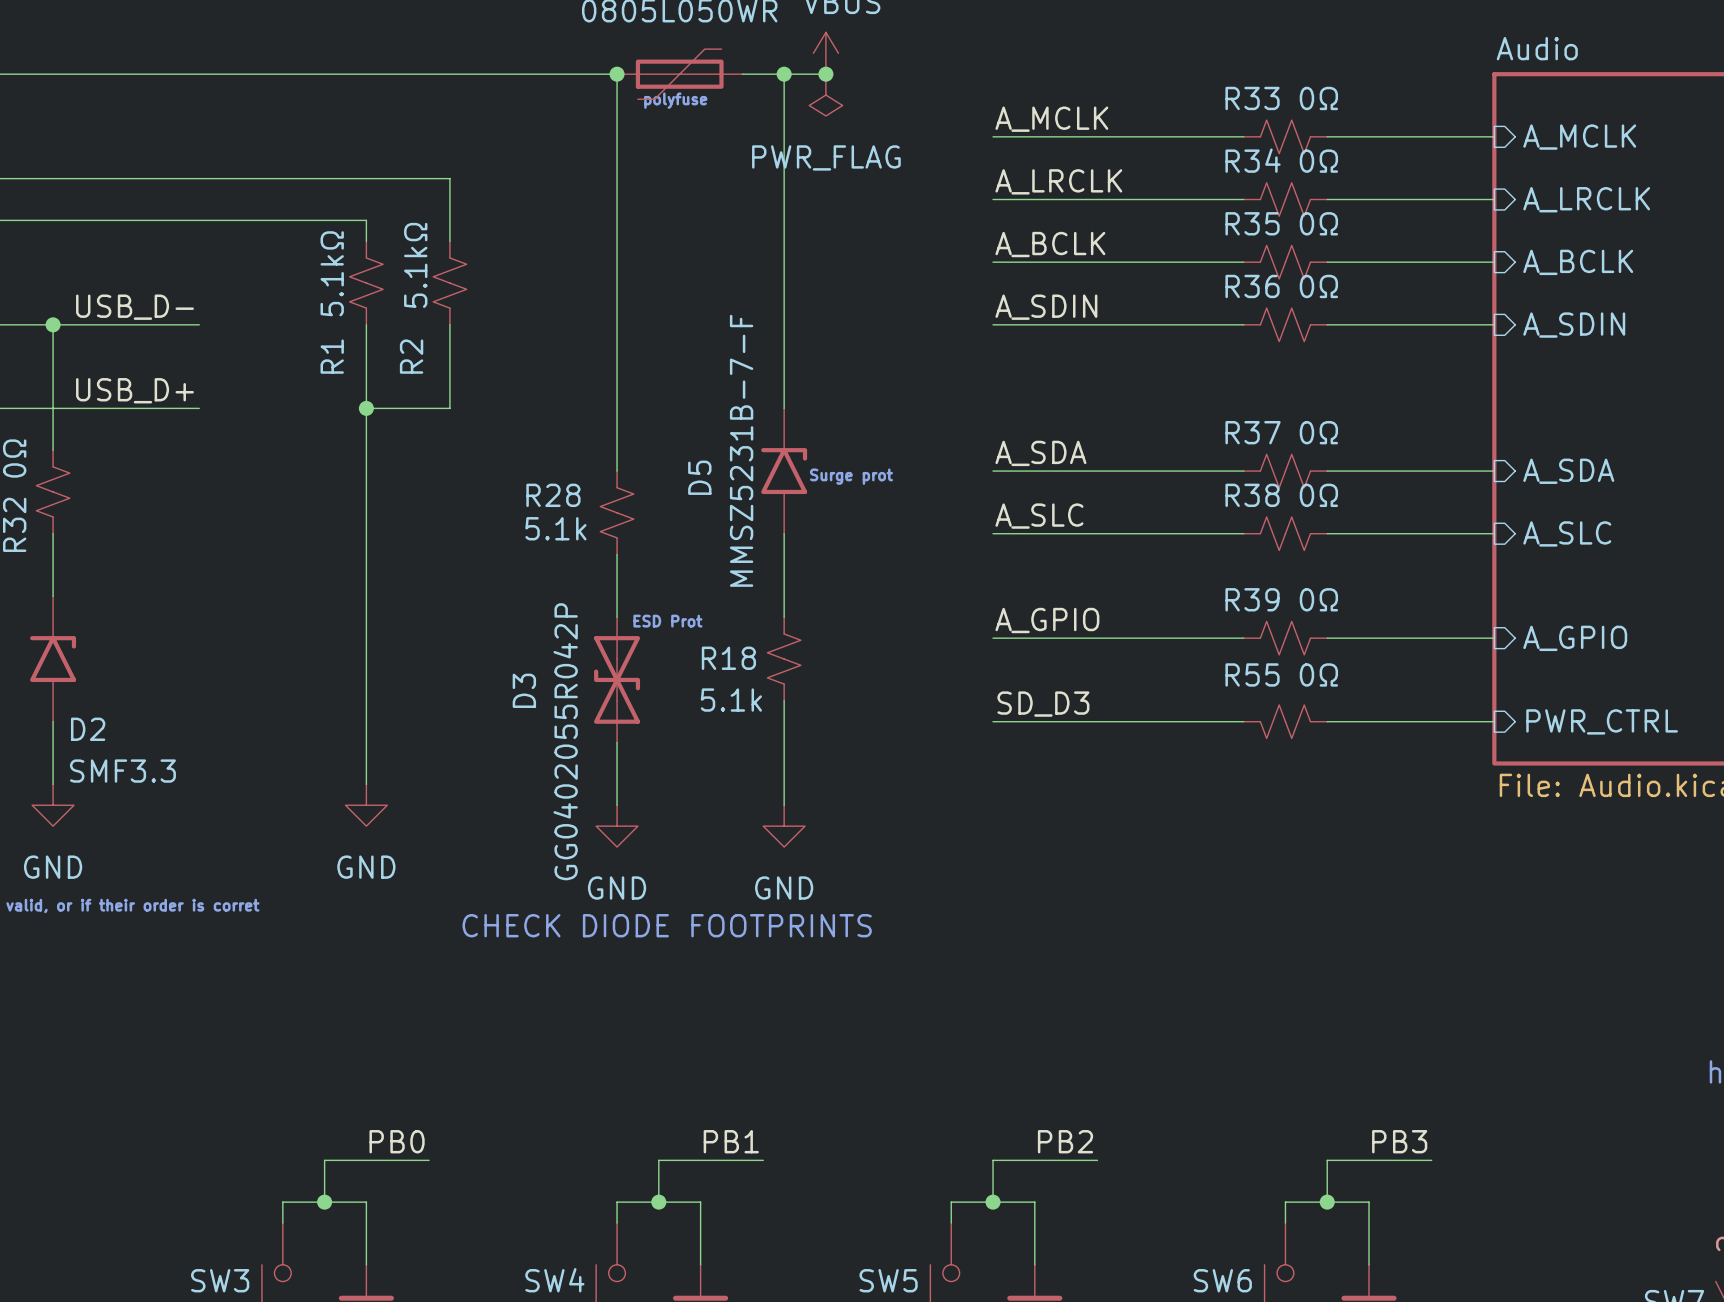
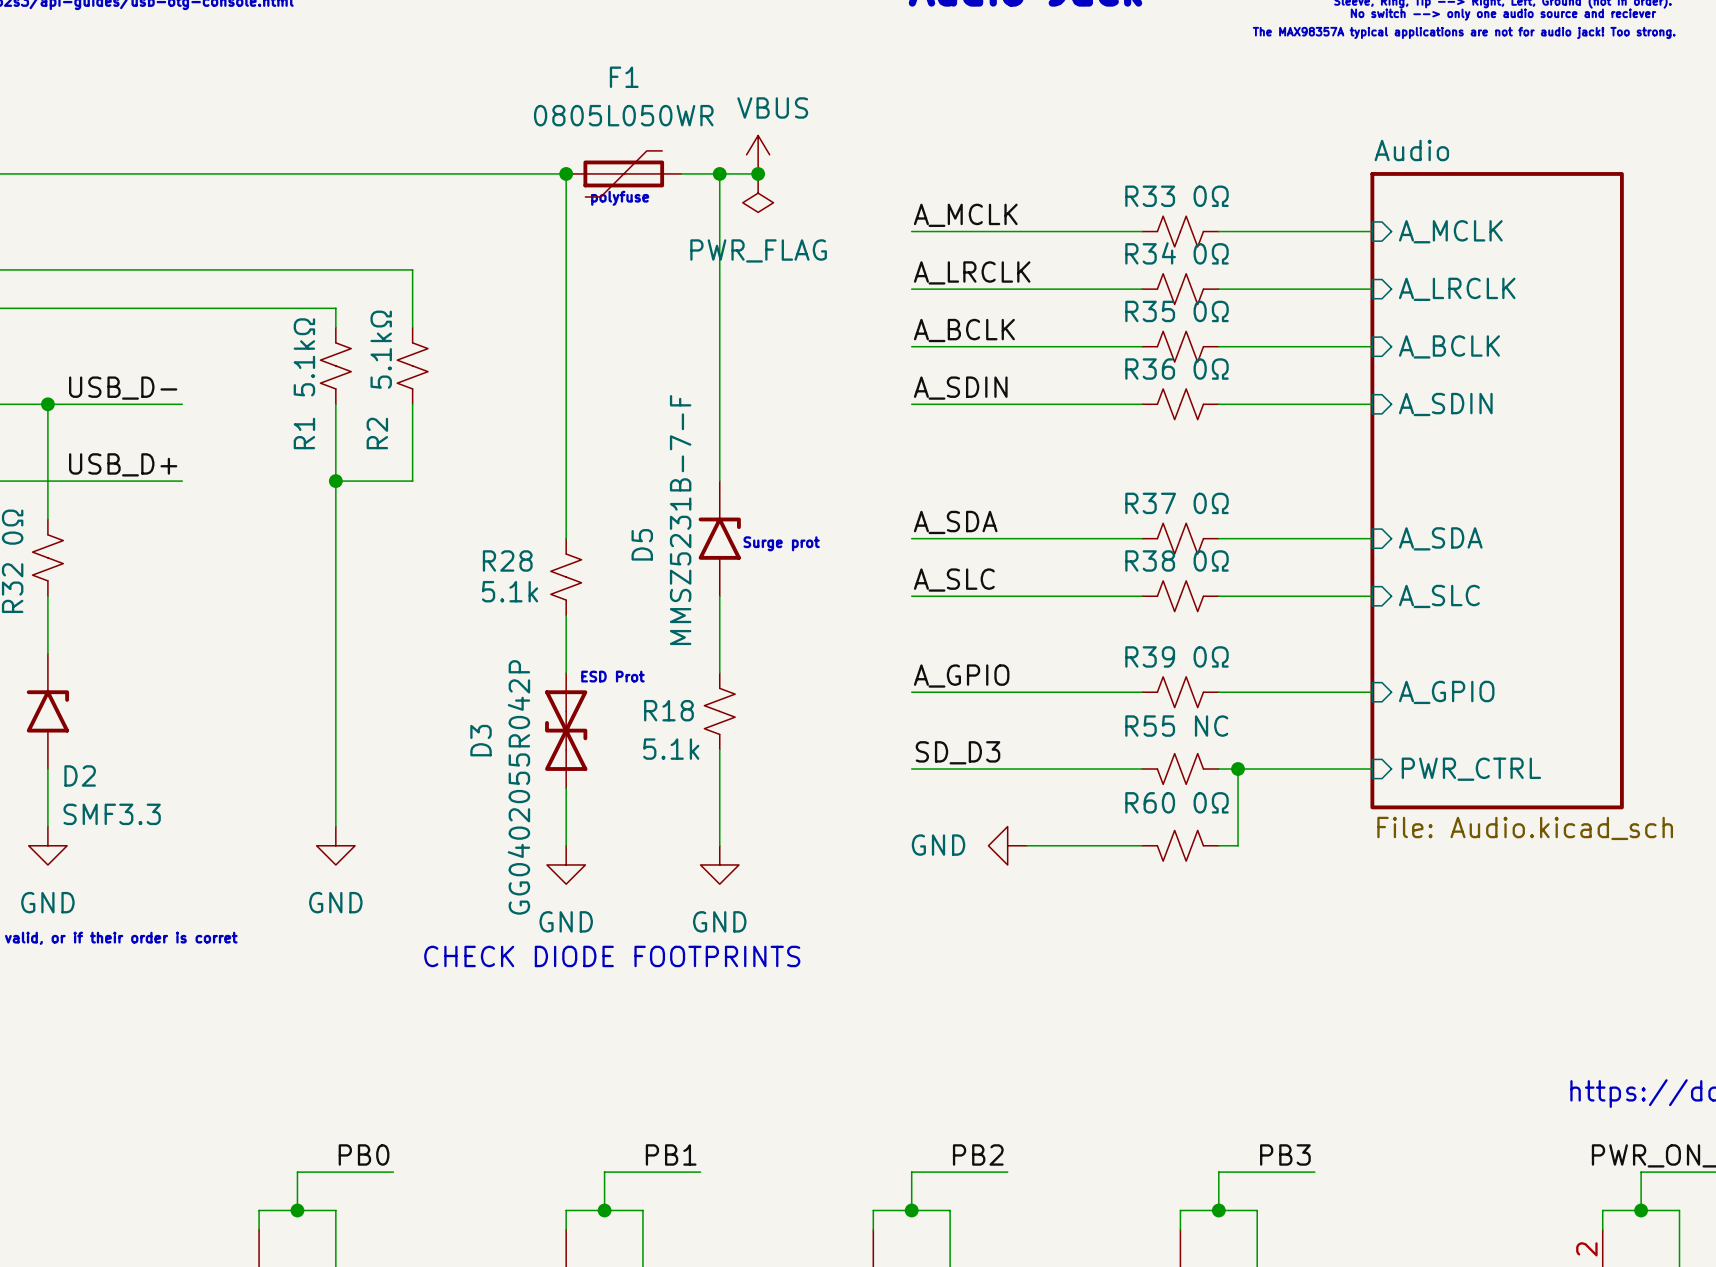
R55 value: 0Ω (1318, 674) -> NC (1211, 726)
wire: none -> (1238, 769) (1238, 845) (1218, 845)
junction: none -> (1238, 769)
power symbol: none -> GND (1007, 845)
wire: none -> (1026, 845) (1142, 845)
R60: none -> 0Ω (1180, 845)

